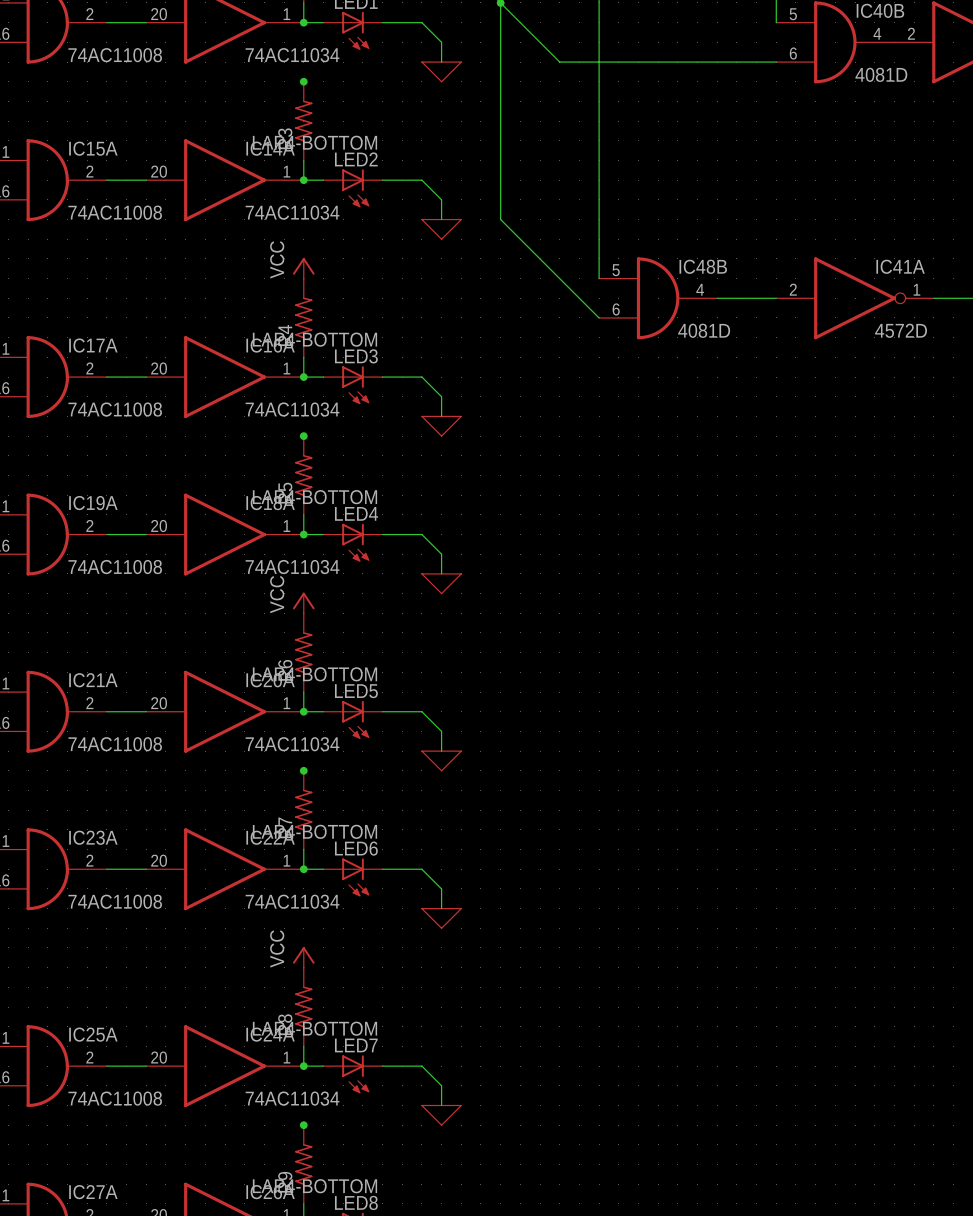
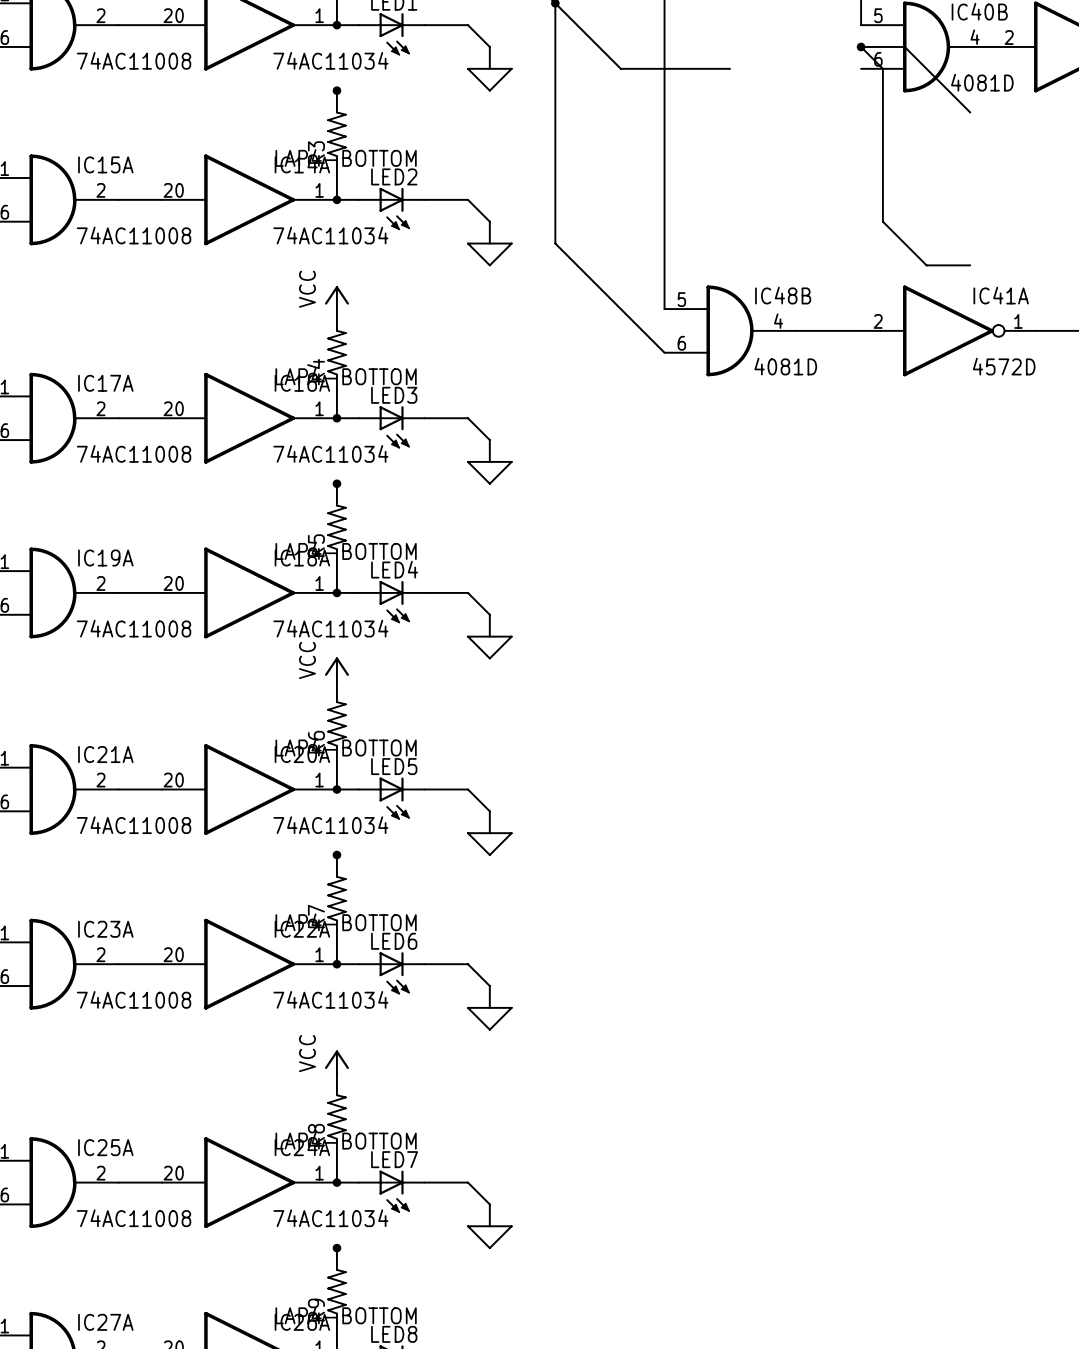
junction: none -> (861, 46)
wire: (658, 62) (776, 62) -> none
wire: none -> (970, 112) (904, 46) (861, 46) (882, 68) (882, 221) (926, 265) (970, 265)

